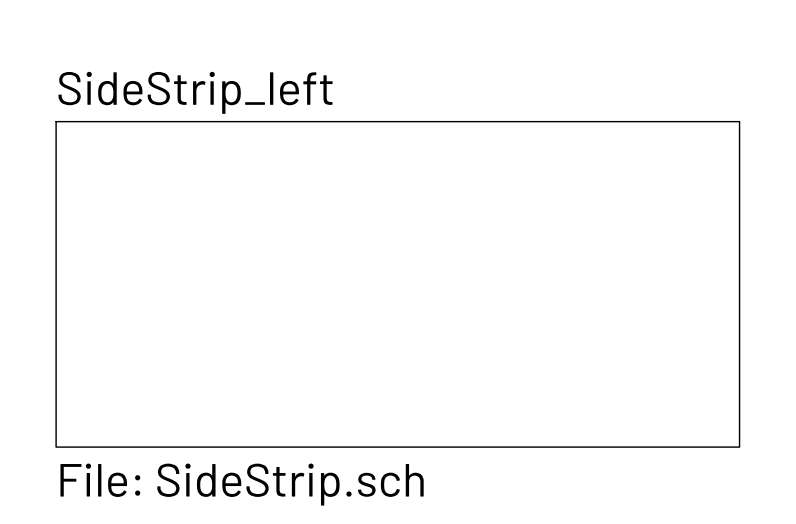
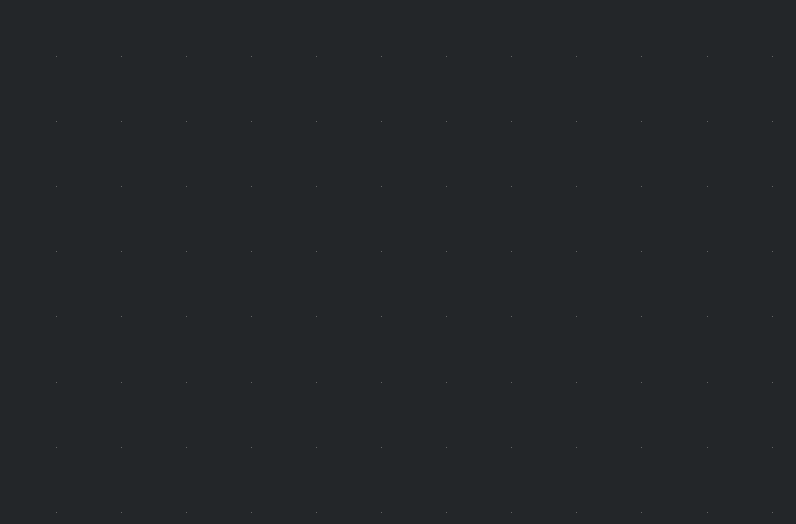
sheet SideStrip_left: File: SideStrip.sch (397, 284) -> none

